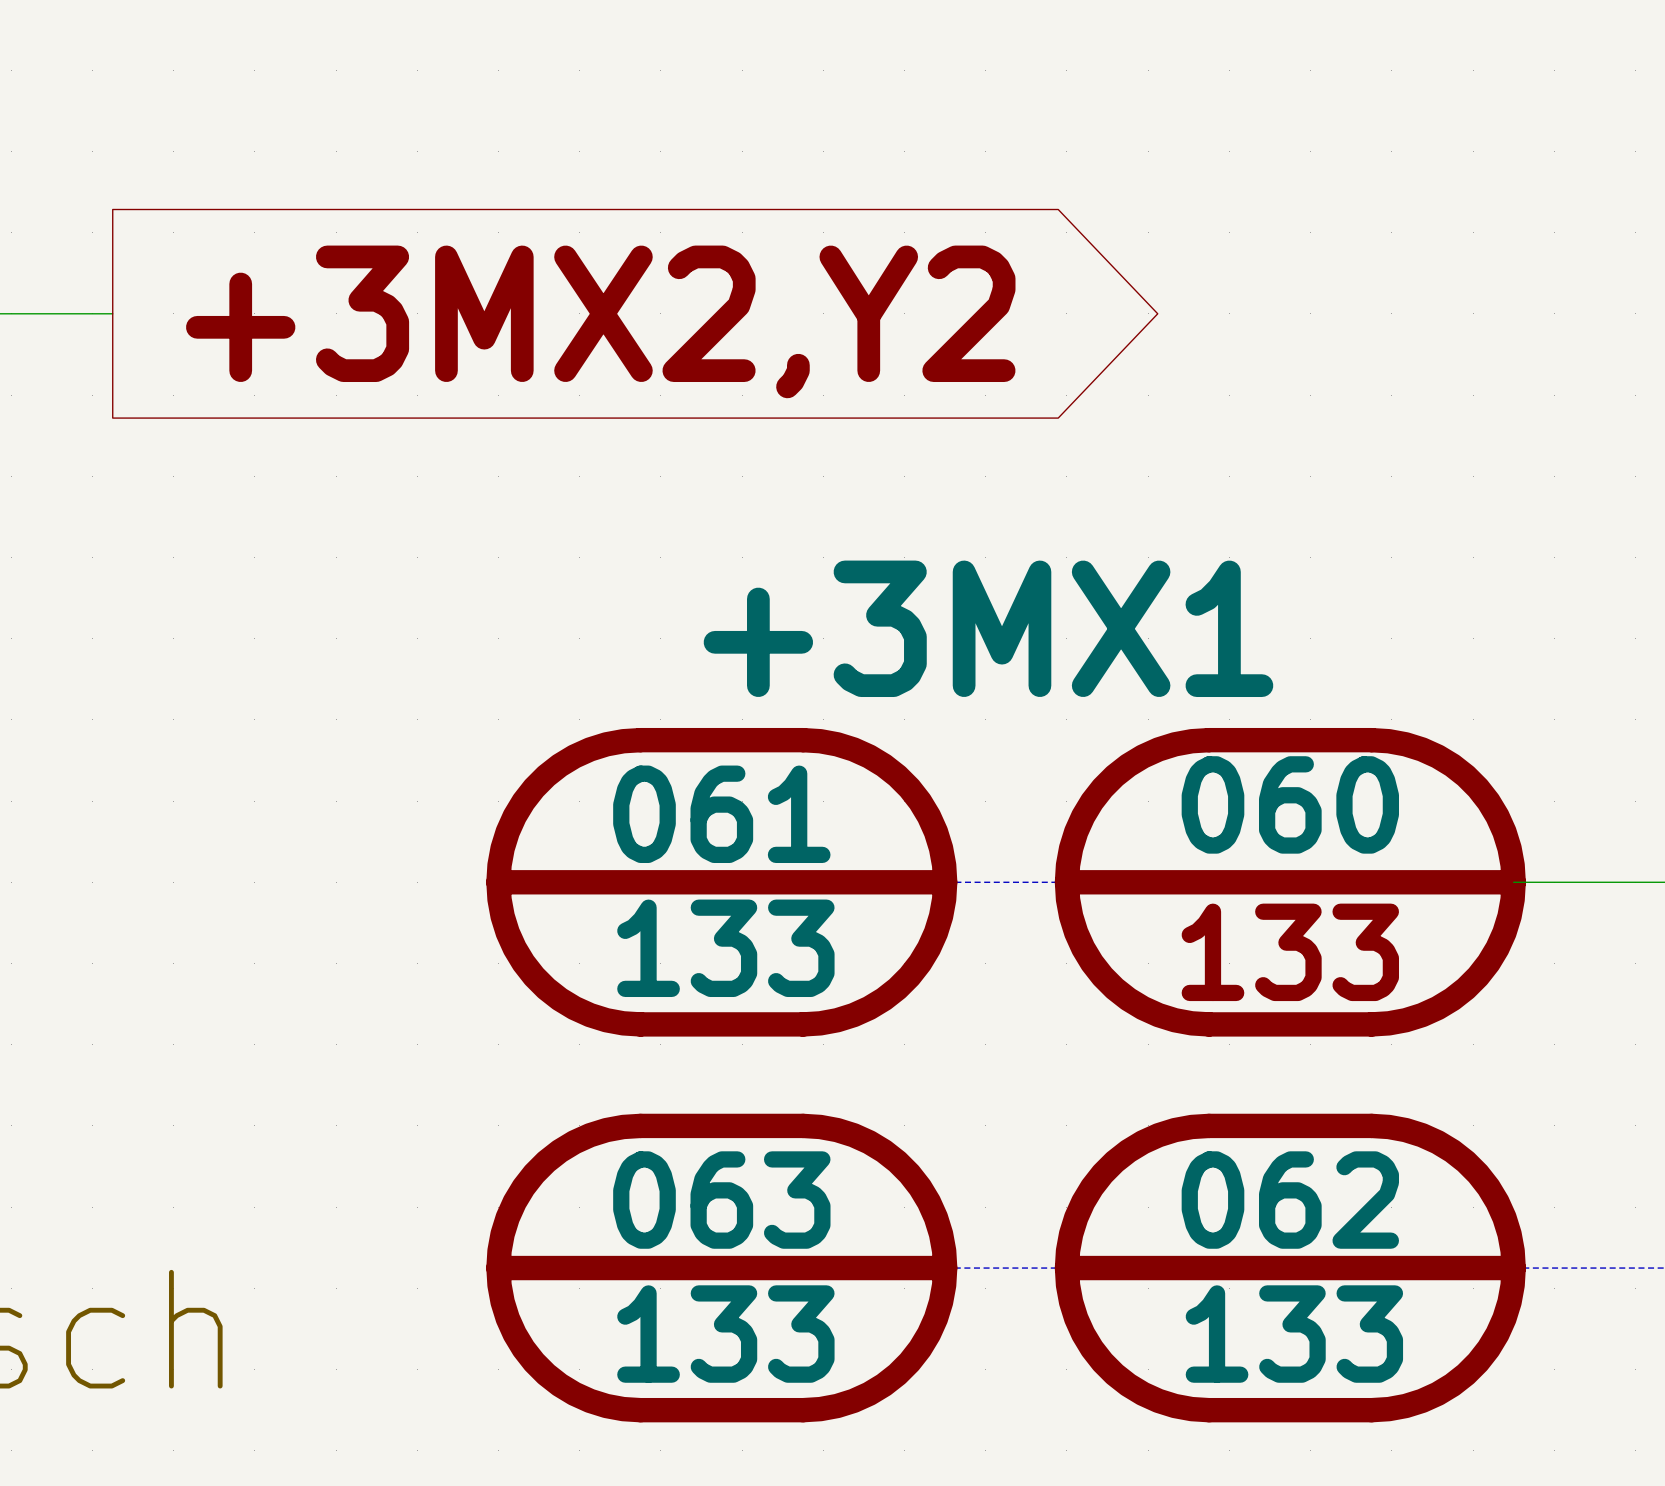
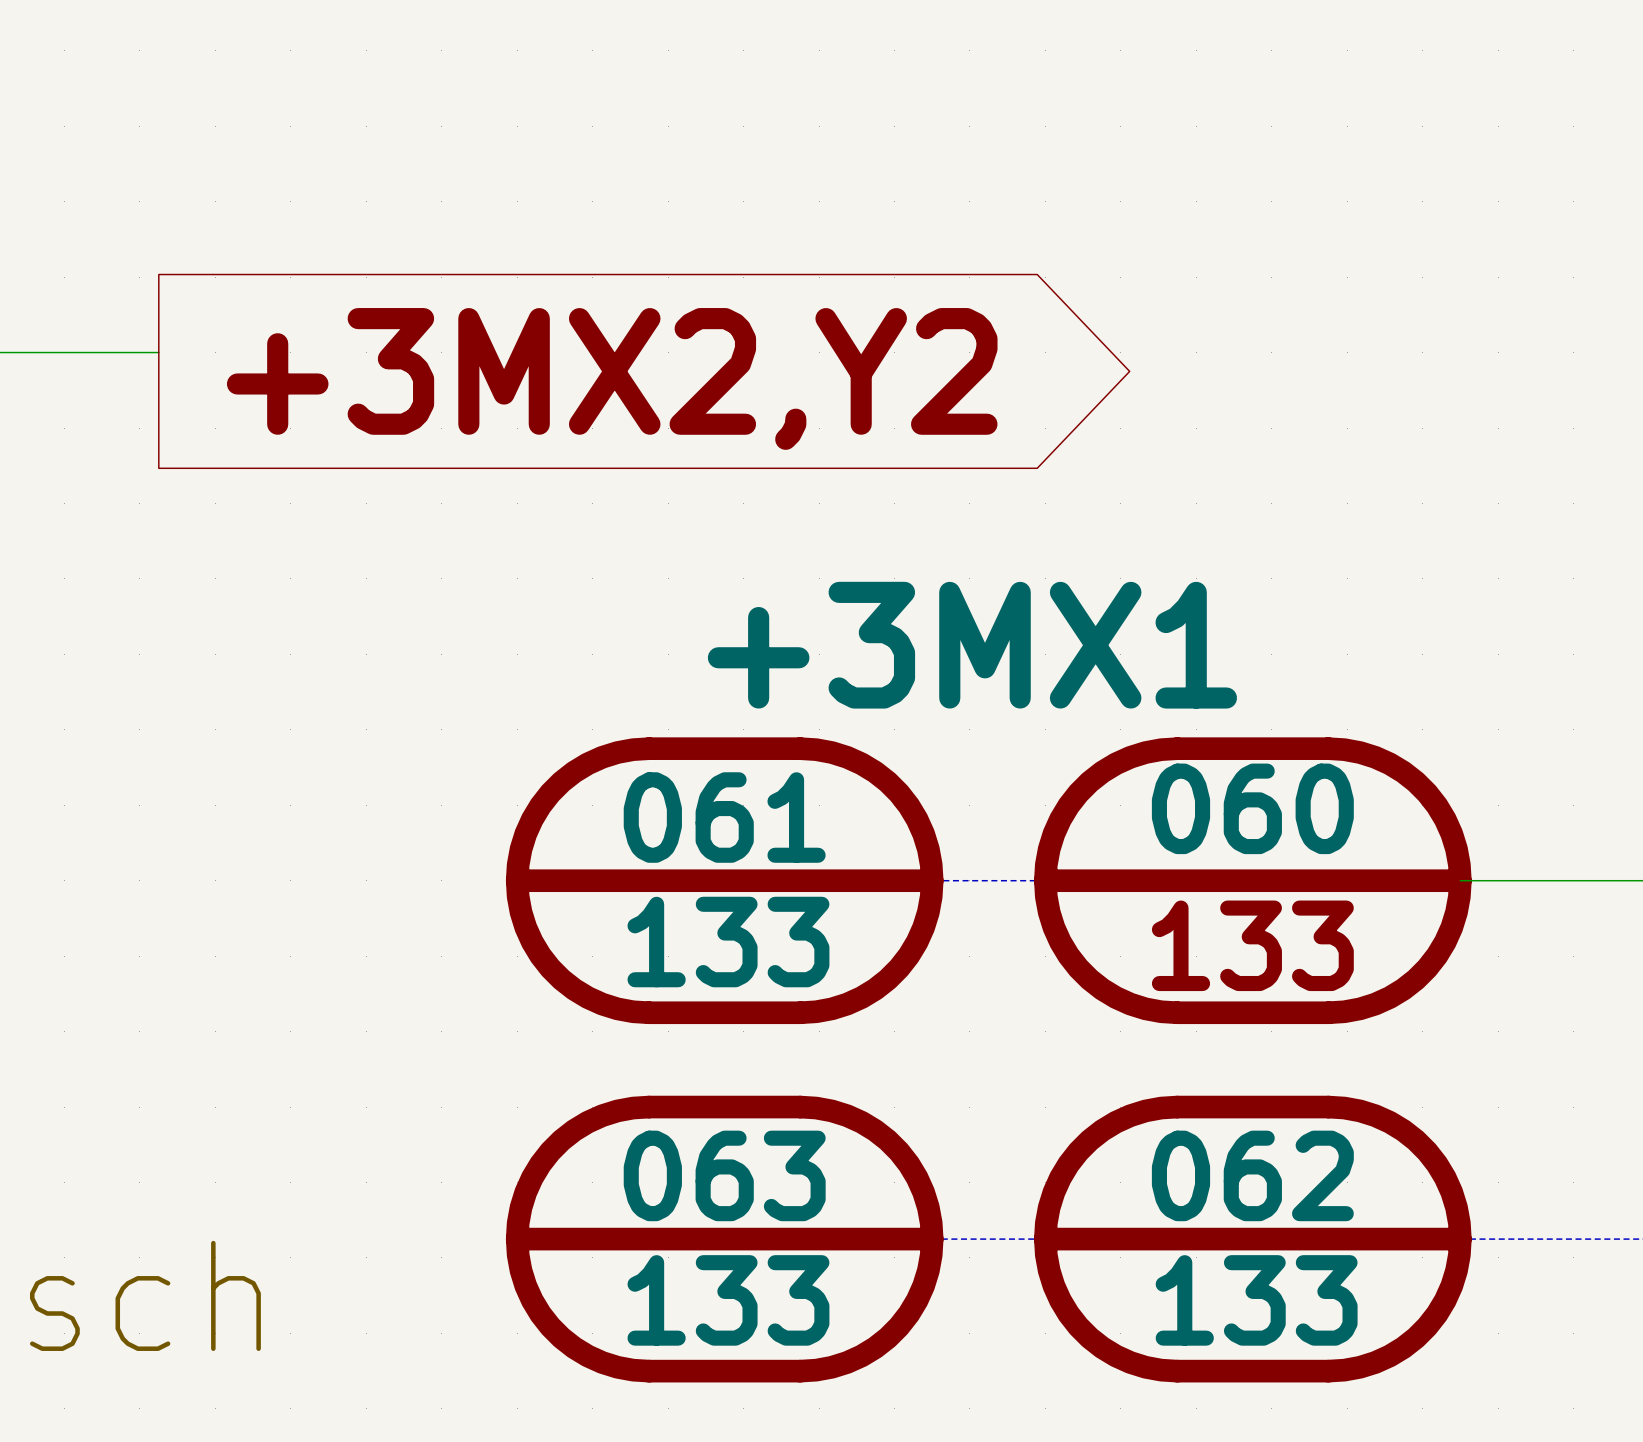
global label position: +3MX2,Y2 (600, 321) -> +3MX2,Y2 (612, 378)

